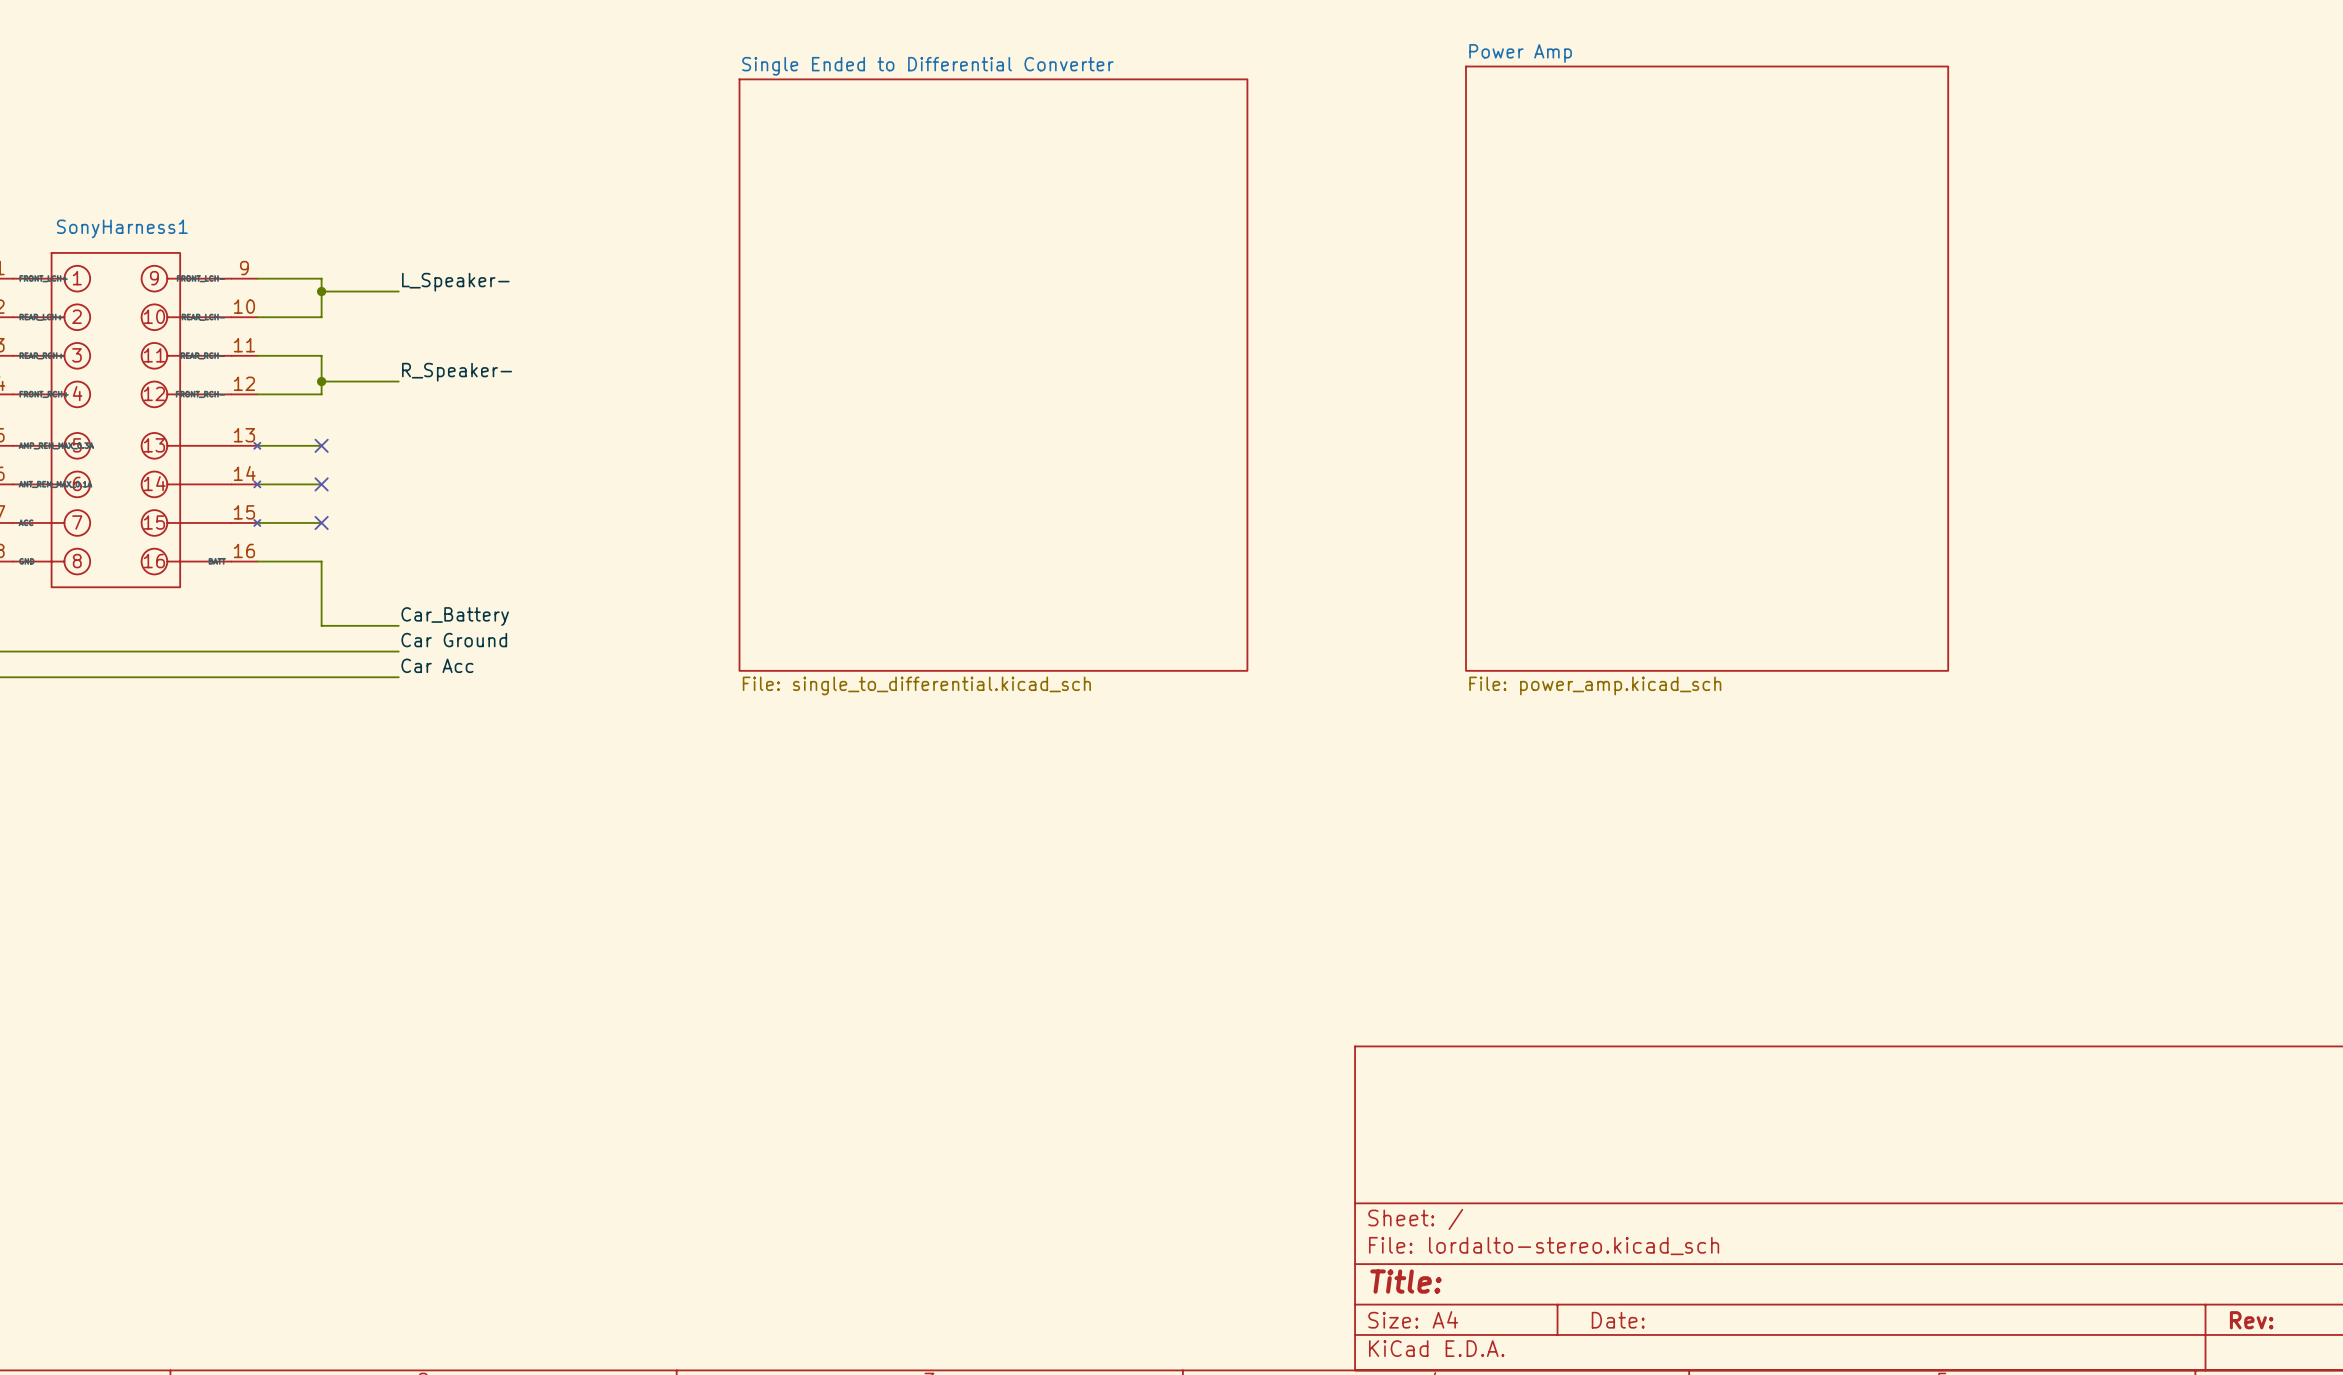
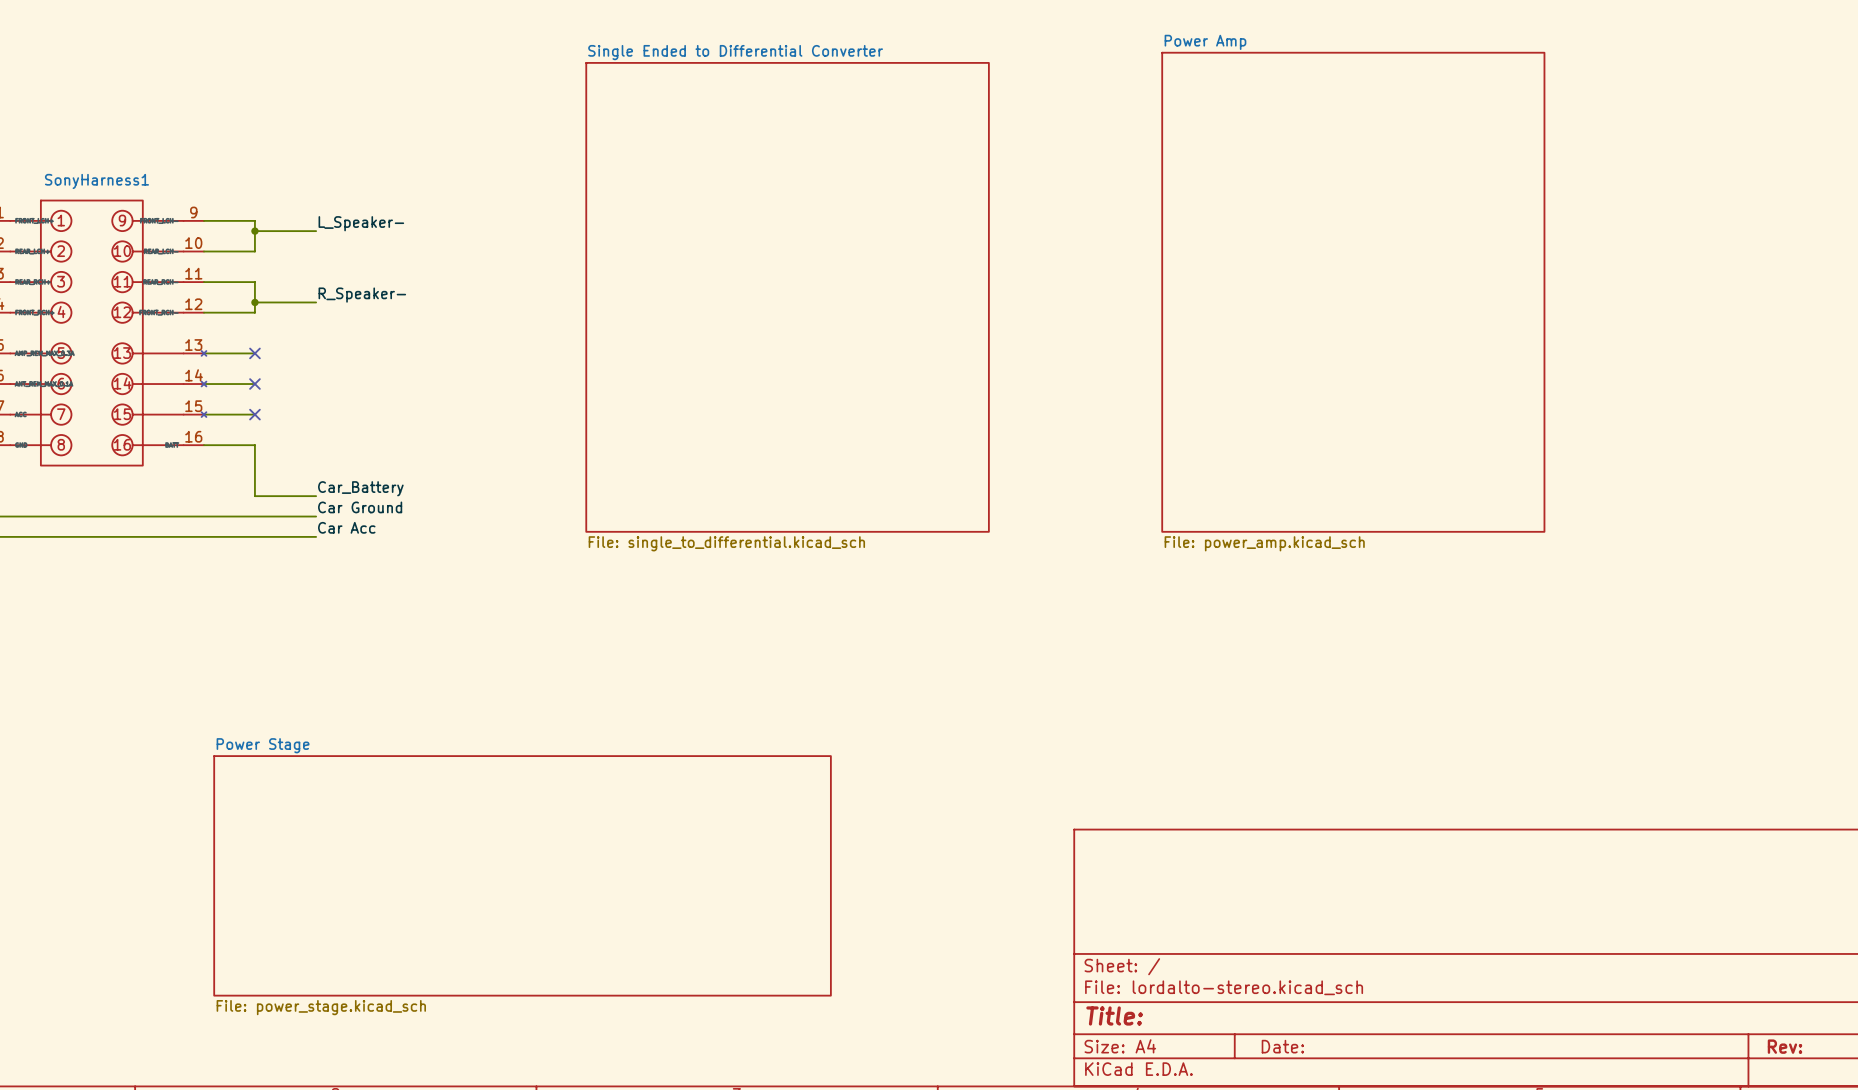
sheet Power Stage: none -> File: power_stage.kicad_sch (522, 875)

